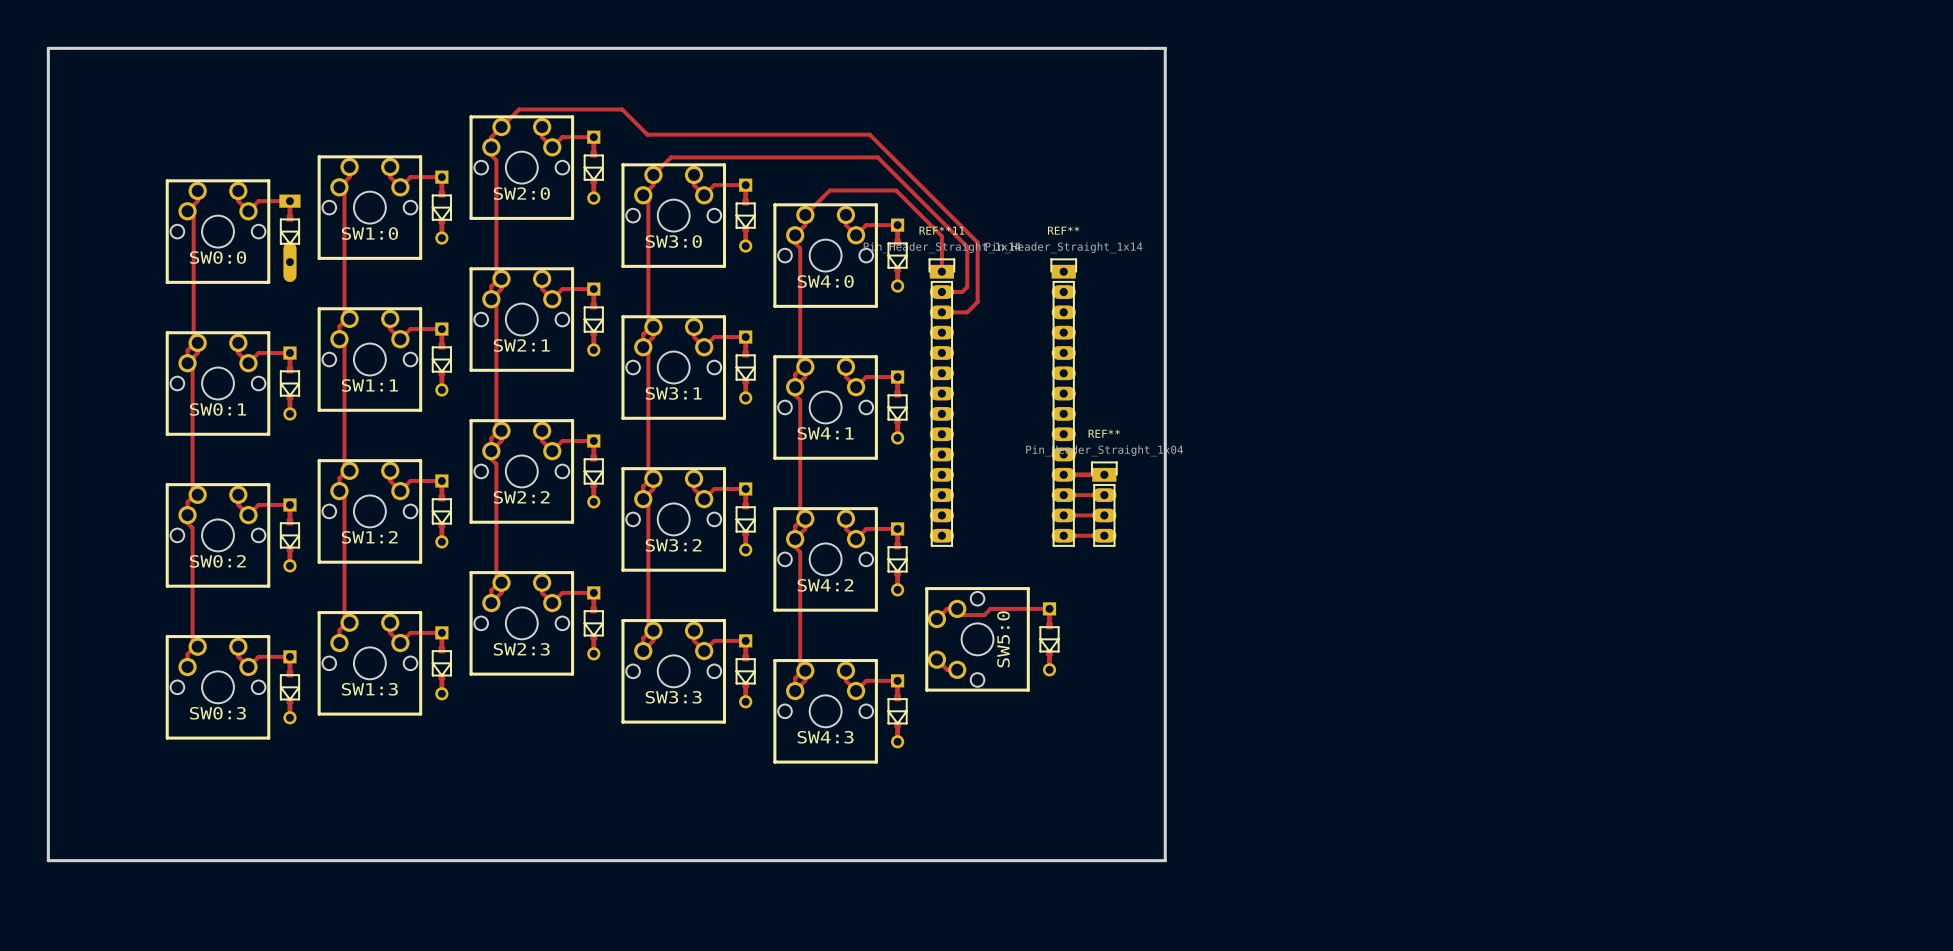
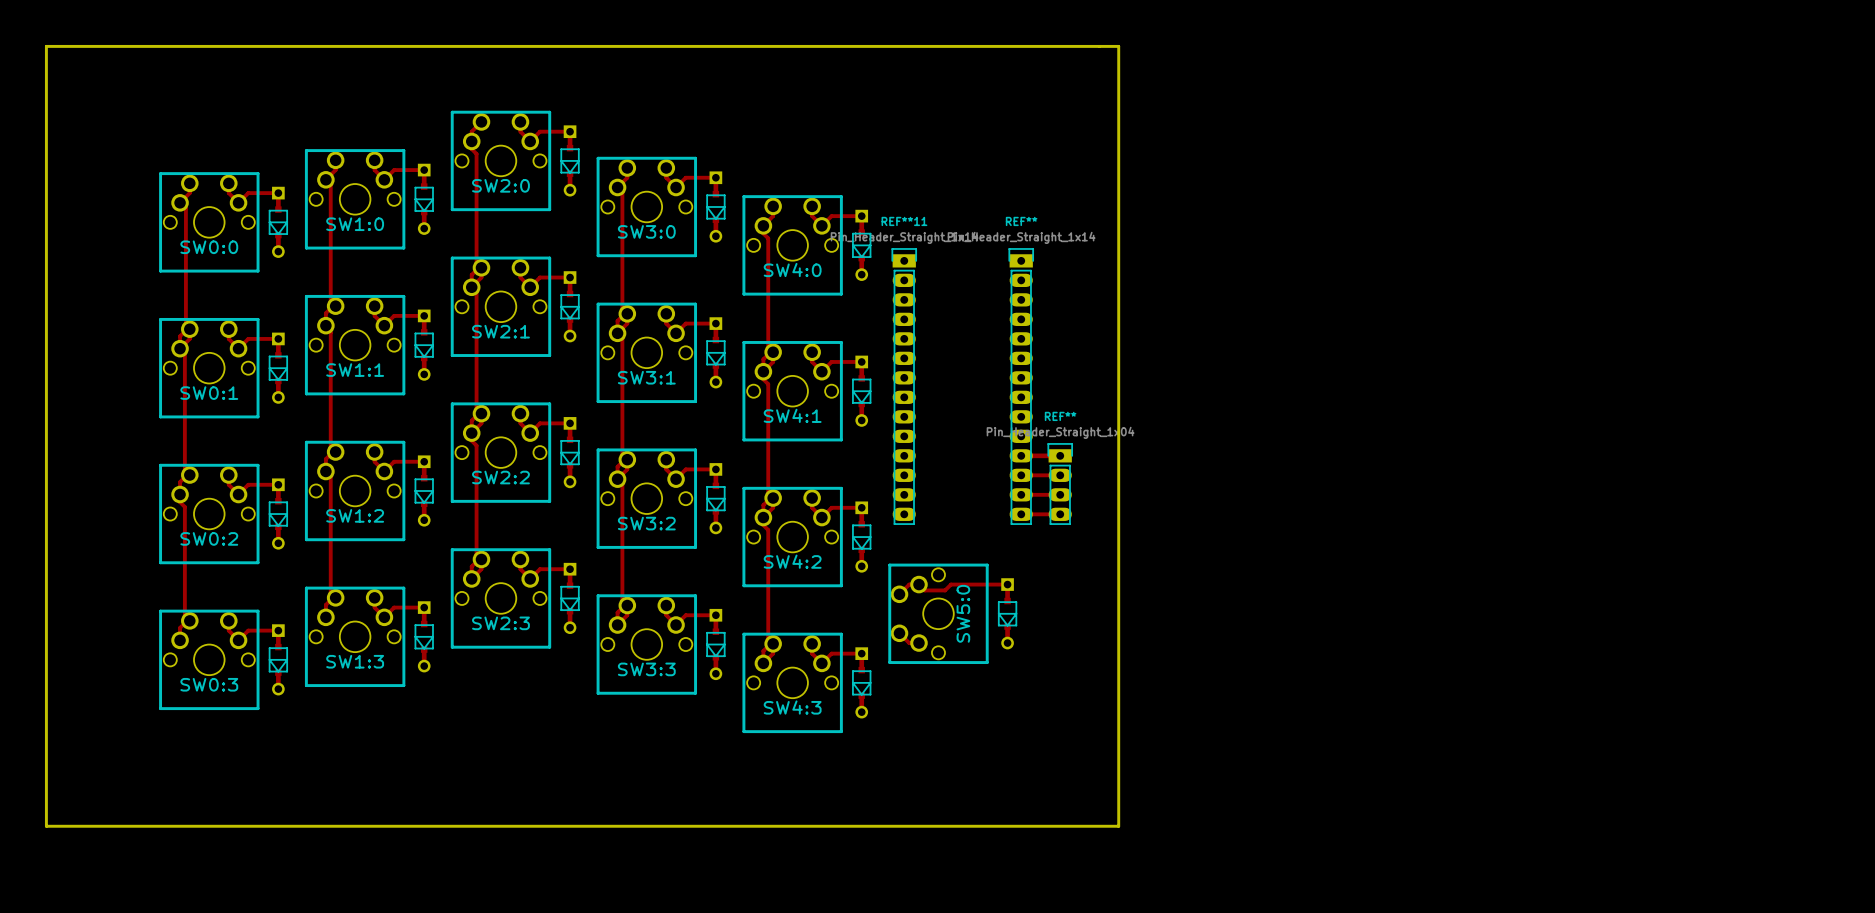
track: (501, 127) (519, 109) (622, 109) (647, 134) (869, 134) (977, 242) (977, 301) (967, 312) (941, 312) -> none
track: (653, 174) (670, 157) (877, 157) (967, 246) (967, 286) (962, 292) (941, 292) -> none
part footprint: [279, 194, 301, 283] -> [268, 186, 288, 258]
track: (805, 214) (829, 190) (896, 190) (941, 236) (941, 271) -> none

